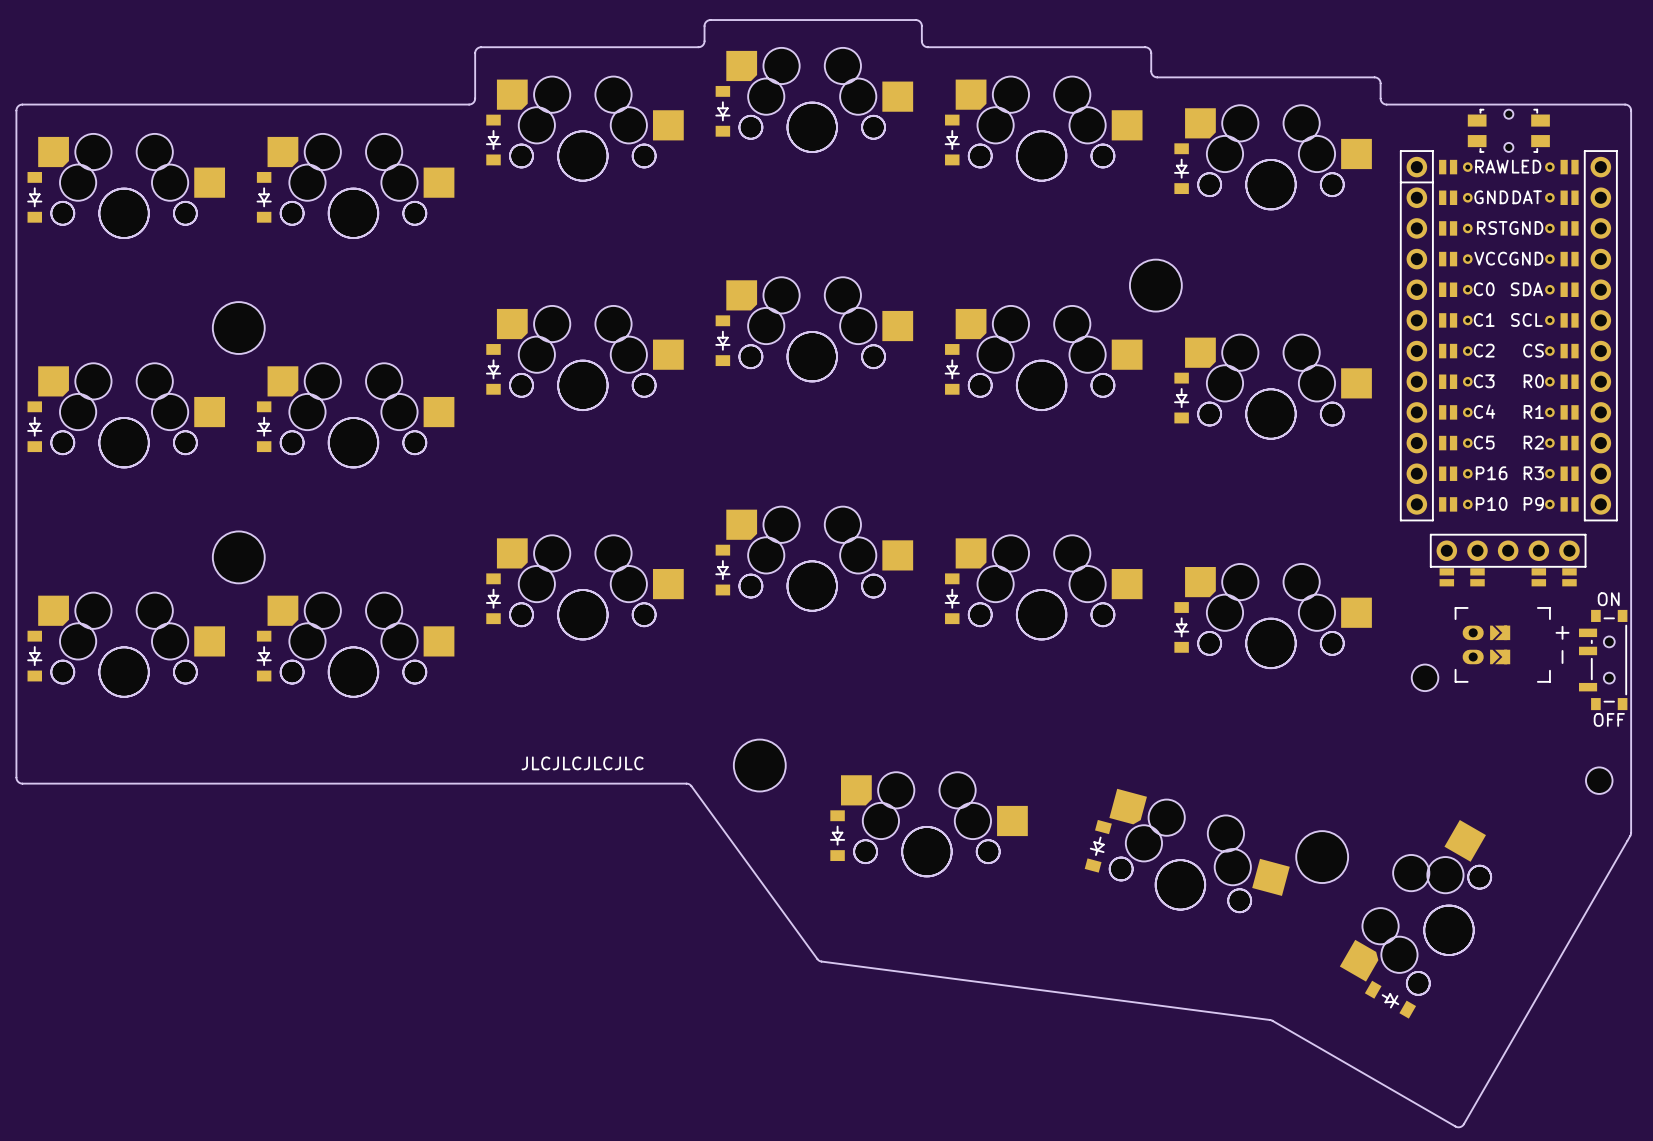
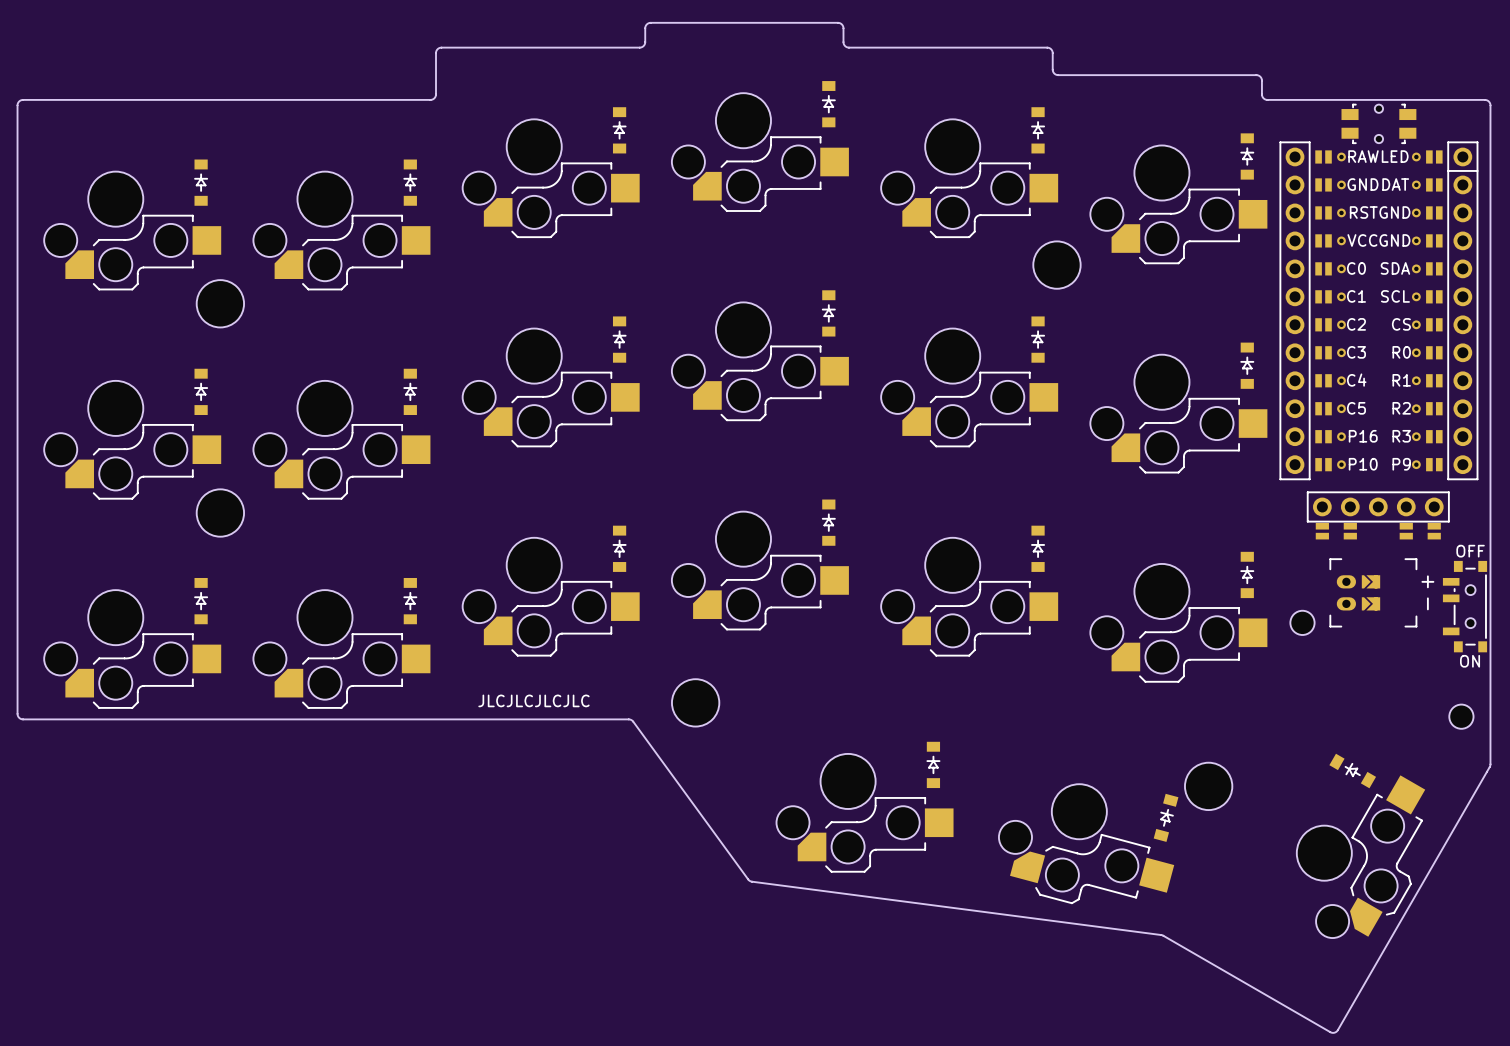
part: (812, 99) -> none
part: (819, 99) -> none
part rotation: 0° (722, 111) -> 180° (619, 130)
part position: (722, 111) -> (619, 130)
part: (582, 128) -> none
part: (590, 128) -> none
part: (1041, 128) -> none
part: (1049, 128) -> none
part rotation: 0° (493, 139) -> 180° (410, 182)
part position: (493, 139) -> (410, 182)
part rotation: 0° (952, 139) -> 180° (828, 104)
part position: (952, 139) -> (828, 104)
part footprint: [1400, 150, 1618, 522] -> [1279, 141, 1479, 480]
part: (1270, 157) -> none
part: (1278, 157) -> none
part: none -> (760, 152)
part: none -> (1247, 156)
part rotation: 0° (1181, 168) -> 180° (1038, 130)
part position: (1181, 168) -> (1038, 130)
part: (124, 185) -> none
part: (131, 185) -> none
part: (353, 185) -> none
part: (360, 185) -> none
part: none -> (551, 178)
part: none -> (969, 178)
part: (34, 197) -> none
part rotation: 0° (264, 197) -> 180° (201, 182)
part position: (264, 197) -> (201, 182)
part: none -> (1178, 204)
part: none -> (132, 230)
part: none -> (341, 230)
part: (812, 329) -> none
part: (819, 329) -> none
part rotation: 0° (722, 340) -> 180° (619, 339)
part position: (722, 340) -> (619, 339)
part: (582, 358) -> none
part: (590, 358) -> none
part: (1041, 358) -> none
part: (1049, 358) -> none
part rotation: 0° (493, 369) -> 180° (410, 391)
part position: (493, 369) -> (410, 391)
part rotation: 0° (952, 369) -> 180° (828, 313)
part position: (952, 369) -> (828, 313)
part: (1270, 386) -> none
part: (1278, 386) -> none
part: none -> (760, 361)
part: none -> (1247, 365)
part rotation: 0° (1181, 398) -> 180° (1038, 339)
part position: (1181, 398) -> (1038, 339)
part: (124, 415) -> none
part: (131, 415) -> none
part: (353, 415) -> none
part: (360, 415) -> none
part: none -> (551, 387)
part: none -> (969, 387)
part: (34, 426) -> none
part rotation: 0° (264, 426) -> 180° (201, 391)
part position: (264, 426) -> (201, 391)
part: none -> (1178, 414)
part: none -> (132, 440)
part: none -> (341, 440)
part: (812, 558) -> none
part: (819, 558) -> none
part rotation: 0° (722, 570) -> 180° (619, 548)
part position: (722, 570) -> (619, 548)
part: (582, 587) -> none
part: (590, 587) -> none
part: (1041, 587) -> none
part: (1049, 587) -> none
part rotation: 0° (493, 598) -> 180° (410, 601)
part position: (493, 598) -> (410, 601)
part rotation: 0° (952, 598) -> 180° (828, 522)
part position: (952, 598) -> (828, 522)
part text: ON (1608, 599) -> OFF (1470, 551)
part: (1270, 616) -> none
part: (1278, 616) -> none
part: none -> (760, 570)
part: none -> (1247, 574)
part rotation: 0° (1181, 627) -> 180° (1038, 548)
part position: (1181, 627) -> (1038, 548)
part: (124, 644) -> none
part: (131, 644) -> none
part: (353, 644) -> none
part: (360, 644) -> none
part: none -> (551, 597)
part: none -> (969, 597)
part: (34, 656) -> none
part rotation: 0° (264, 656) -> 180° (201, 601)
part position: (264, 656) -> (201, 601)
part: none -> (1178, 623)
part: none -> (132, 649)
part: none -> (341, 649)
part text: OFF (1609, 719) -> ON (1470, 661)
part: (926, 824) -> none
part: (934, 824) -> none
part: none -> (933, 764)
part: (837, 835) -> none
part rotation: 0° (1098, 846) -> 180° (1166, 817)
part position: (1098, 846) -> (1166, 817)
part: (1199, 850) -> none
part: (1180, 863) -> none
part: none -> (865, 813)
part: (1415, 907) -> none
part: none -> (1086, 844)
part: (1436, 924) -> none
part: none -> (1361, 856)
part rotation: 0° (1390, 999) -> 180° (1352, 771)
part position: (1390, 999) -> (1352, 771)

